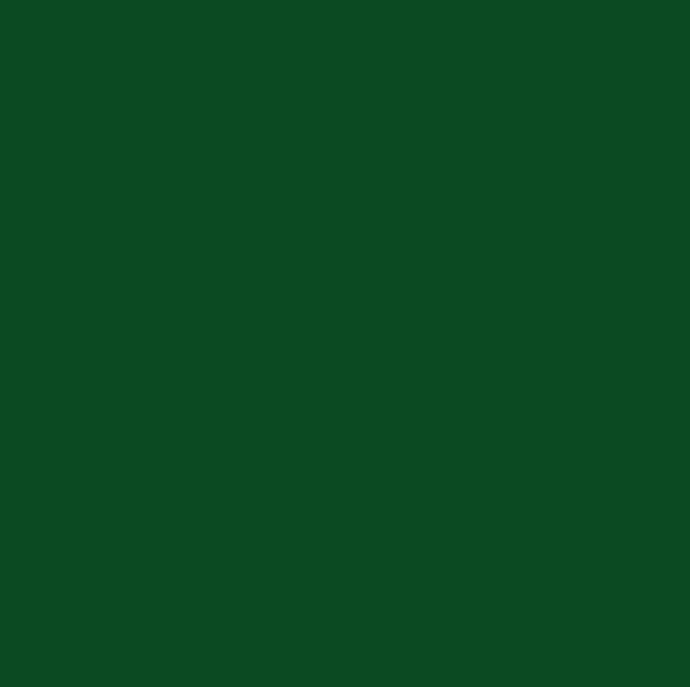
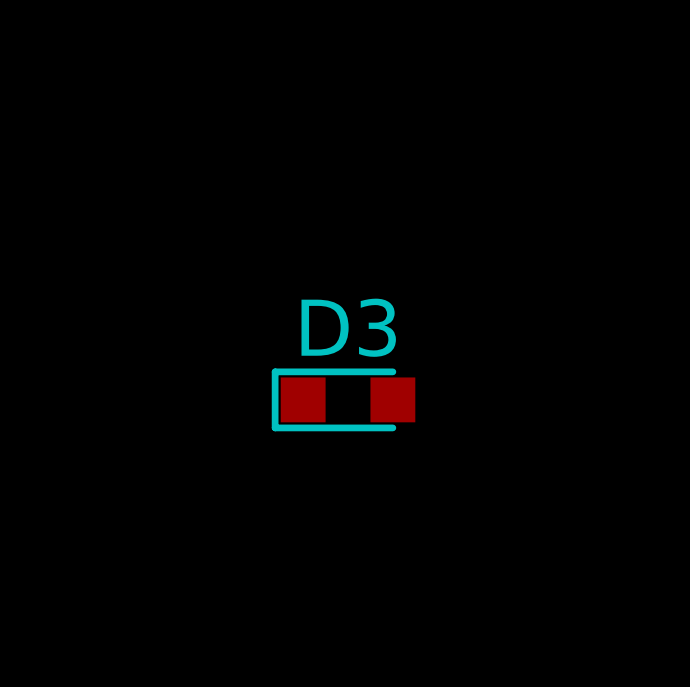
D3: none -> (343, 399)

